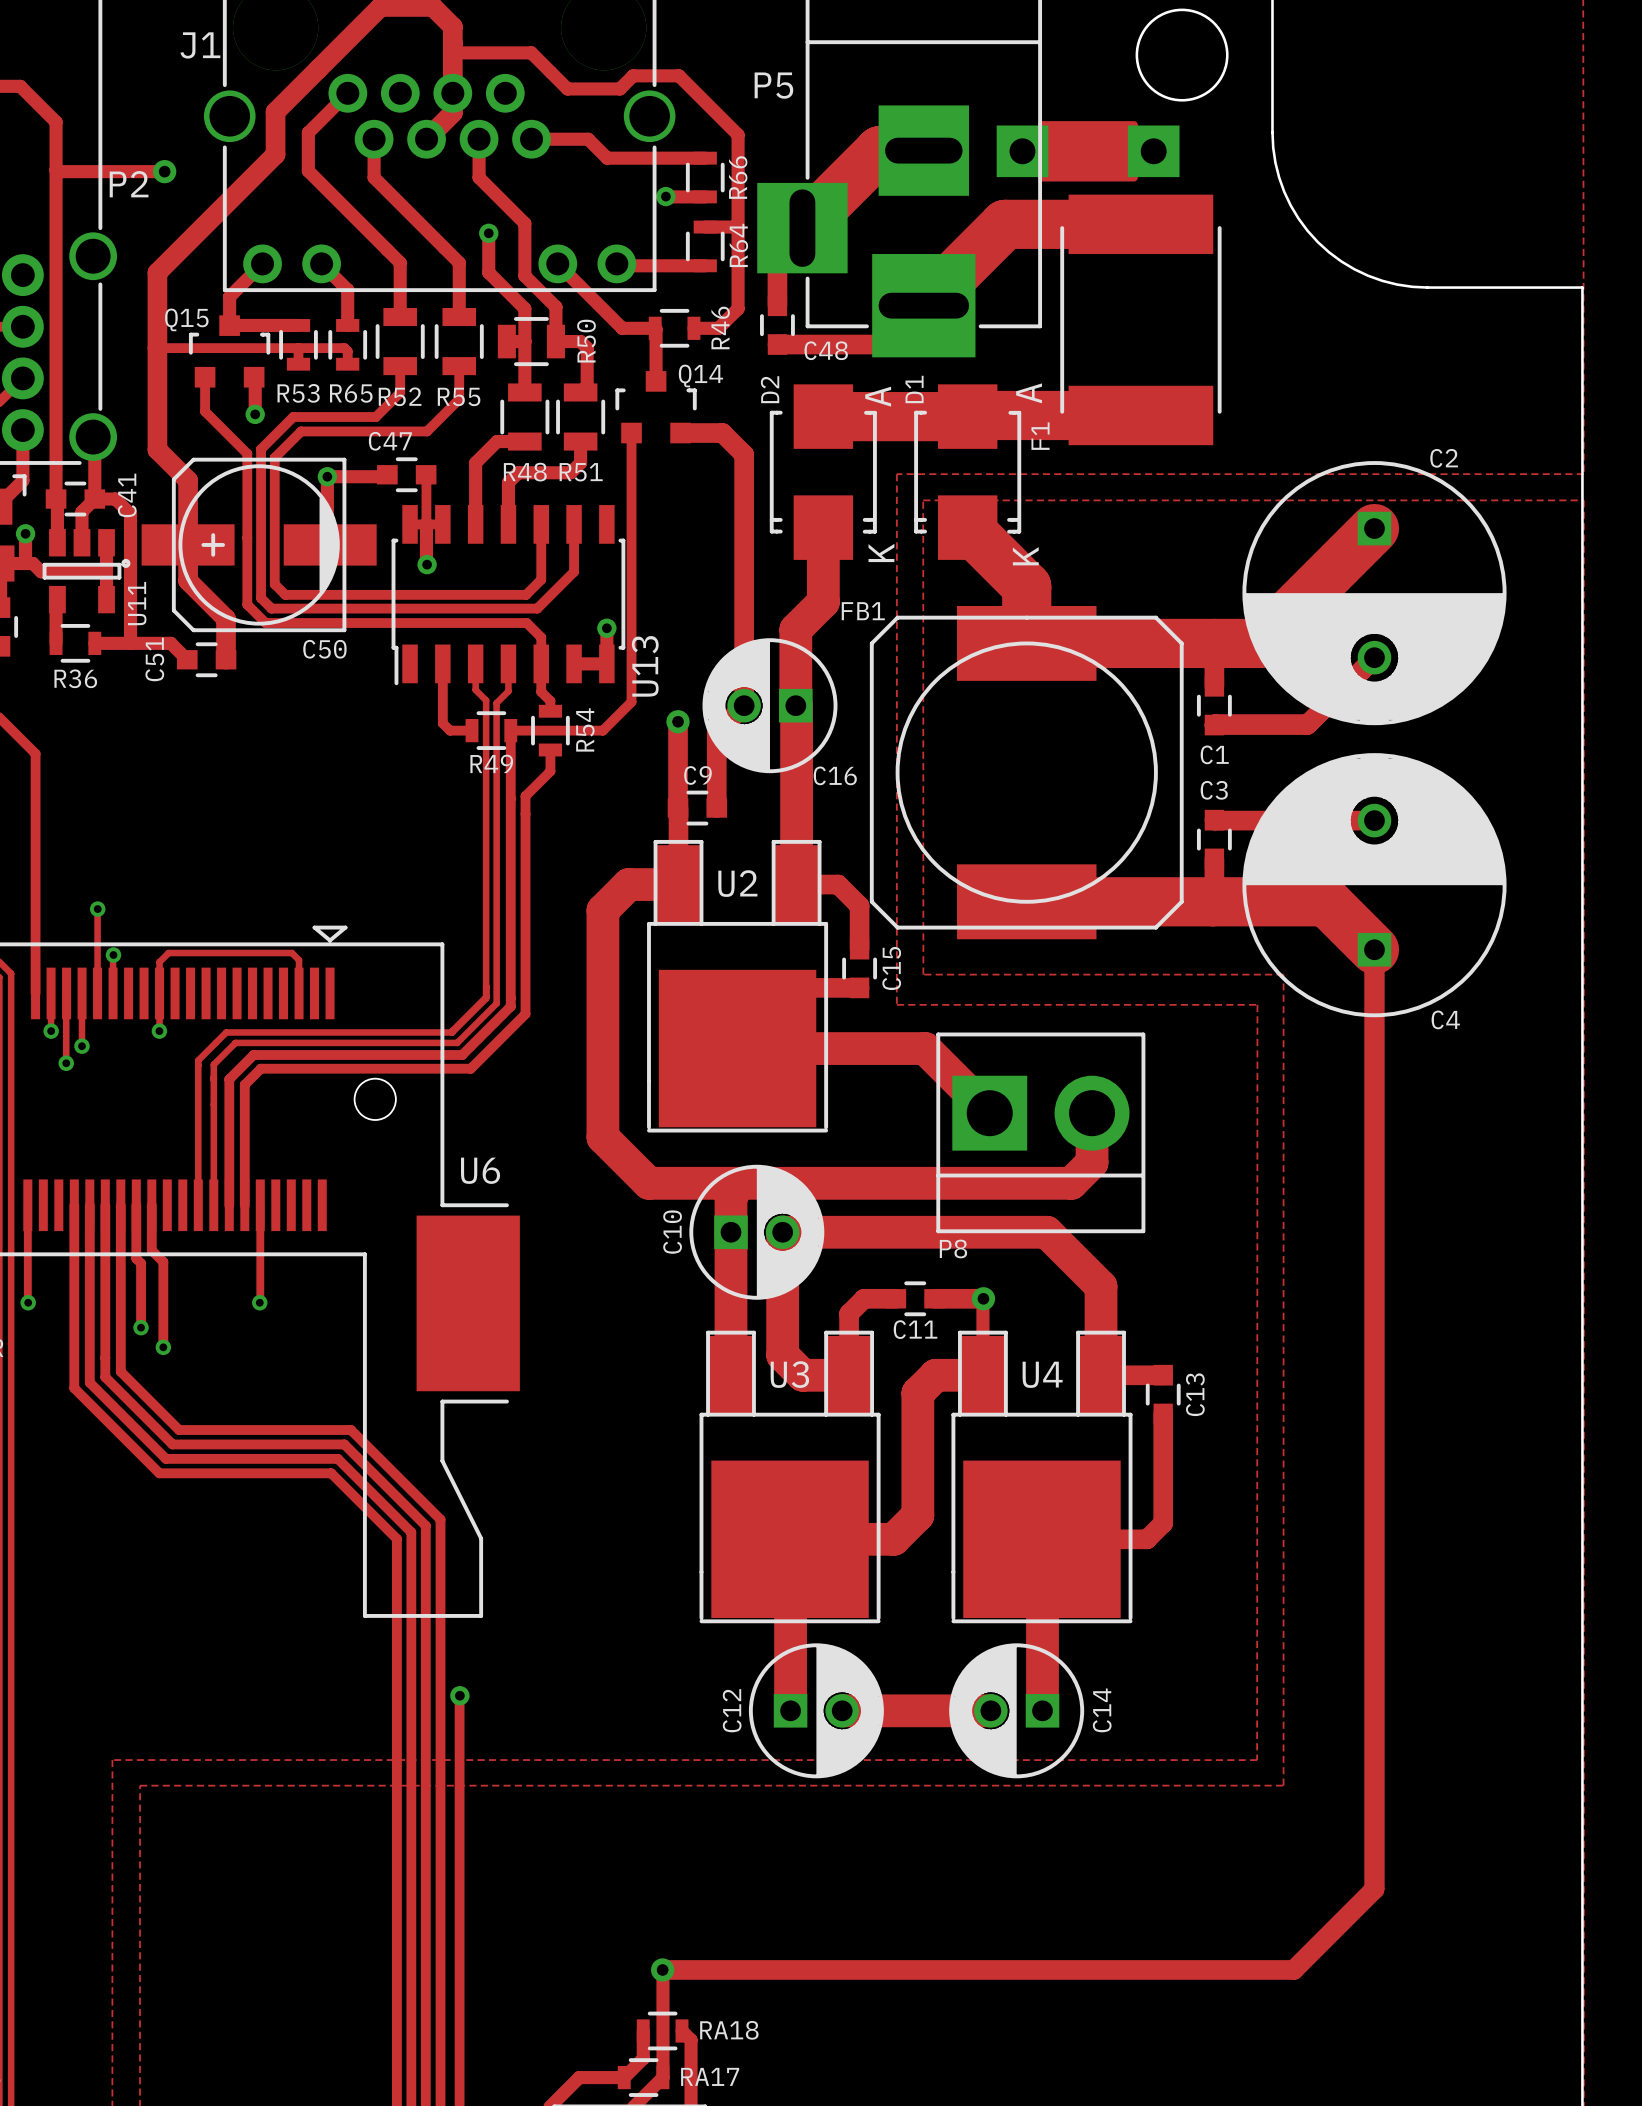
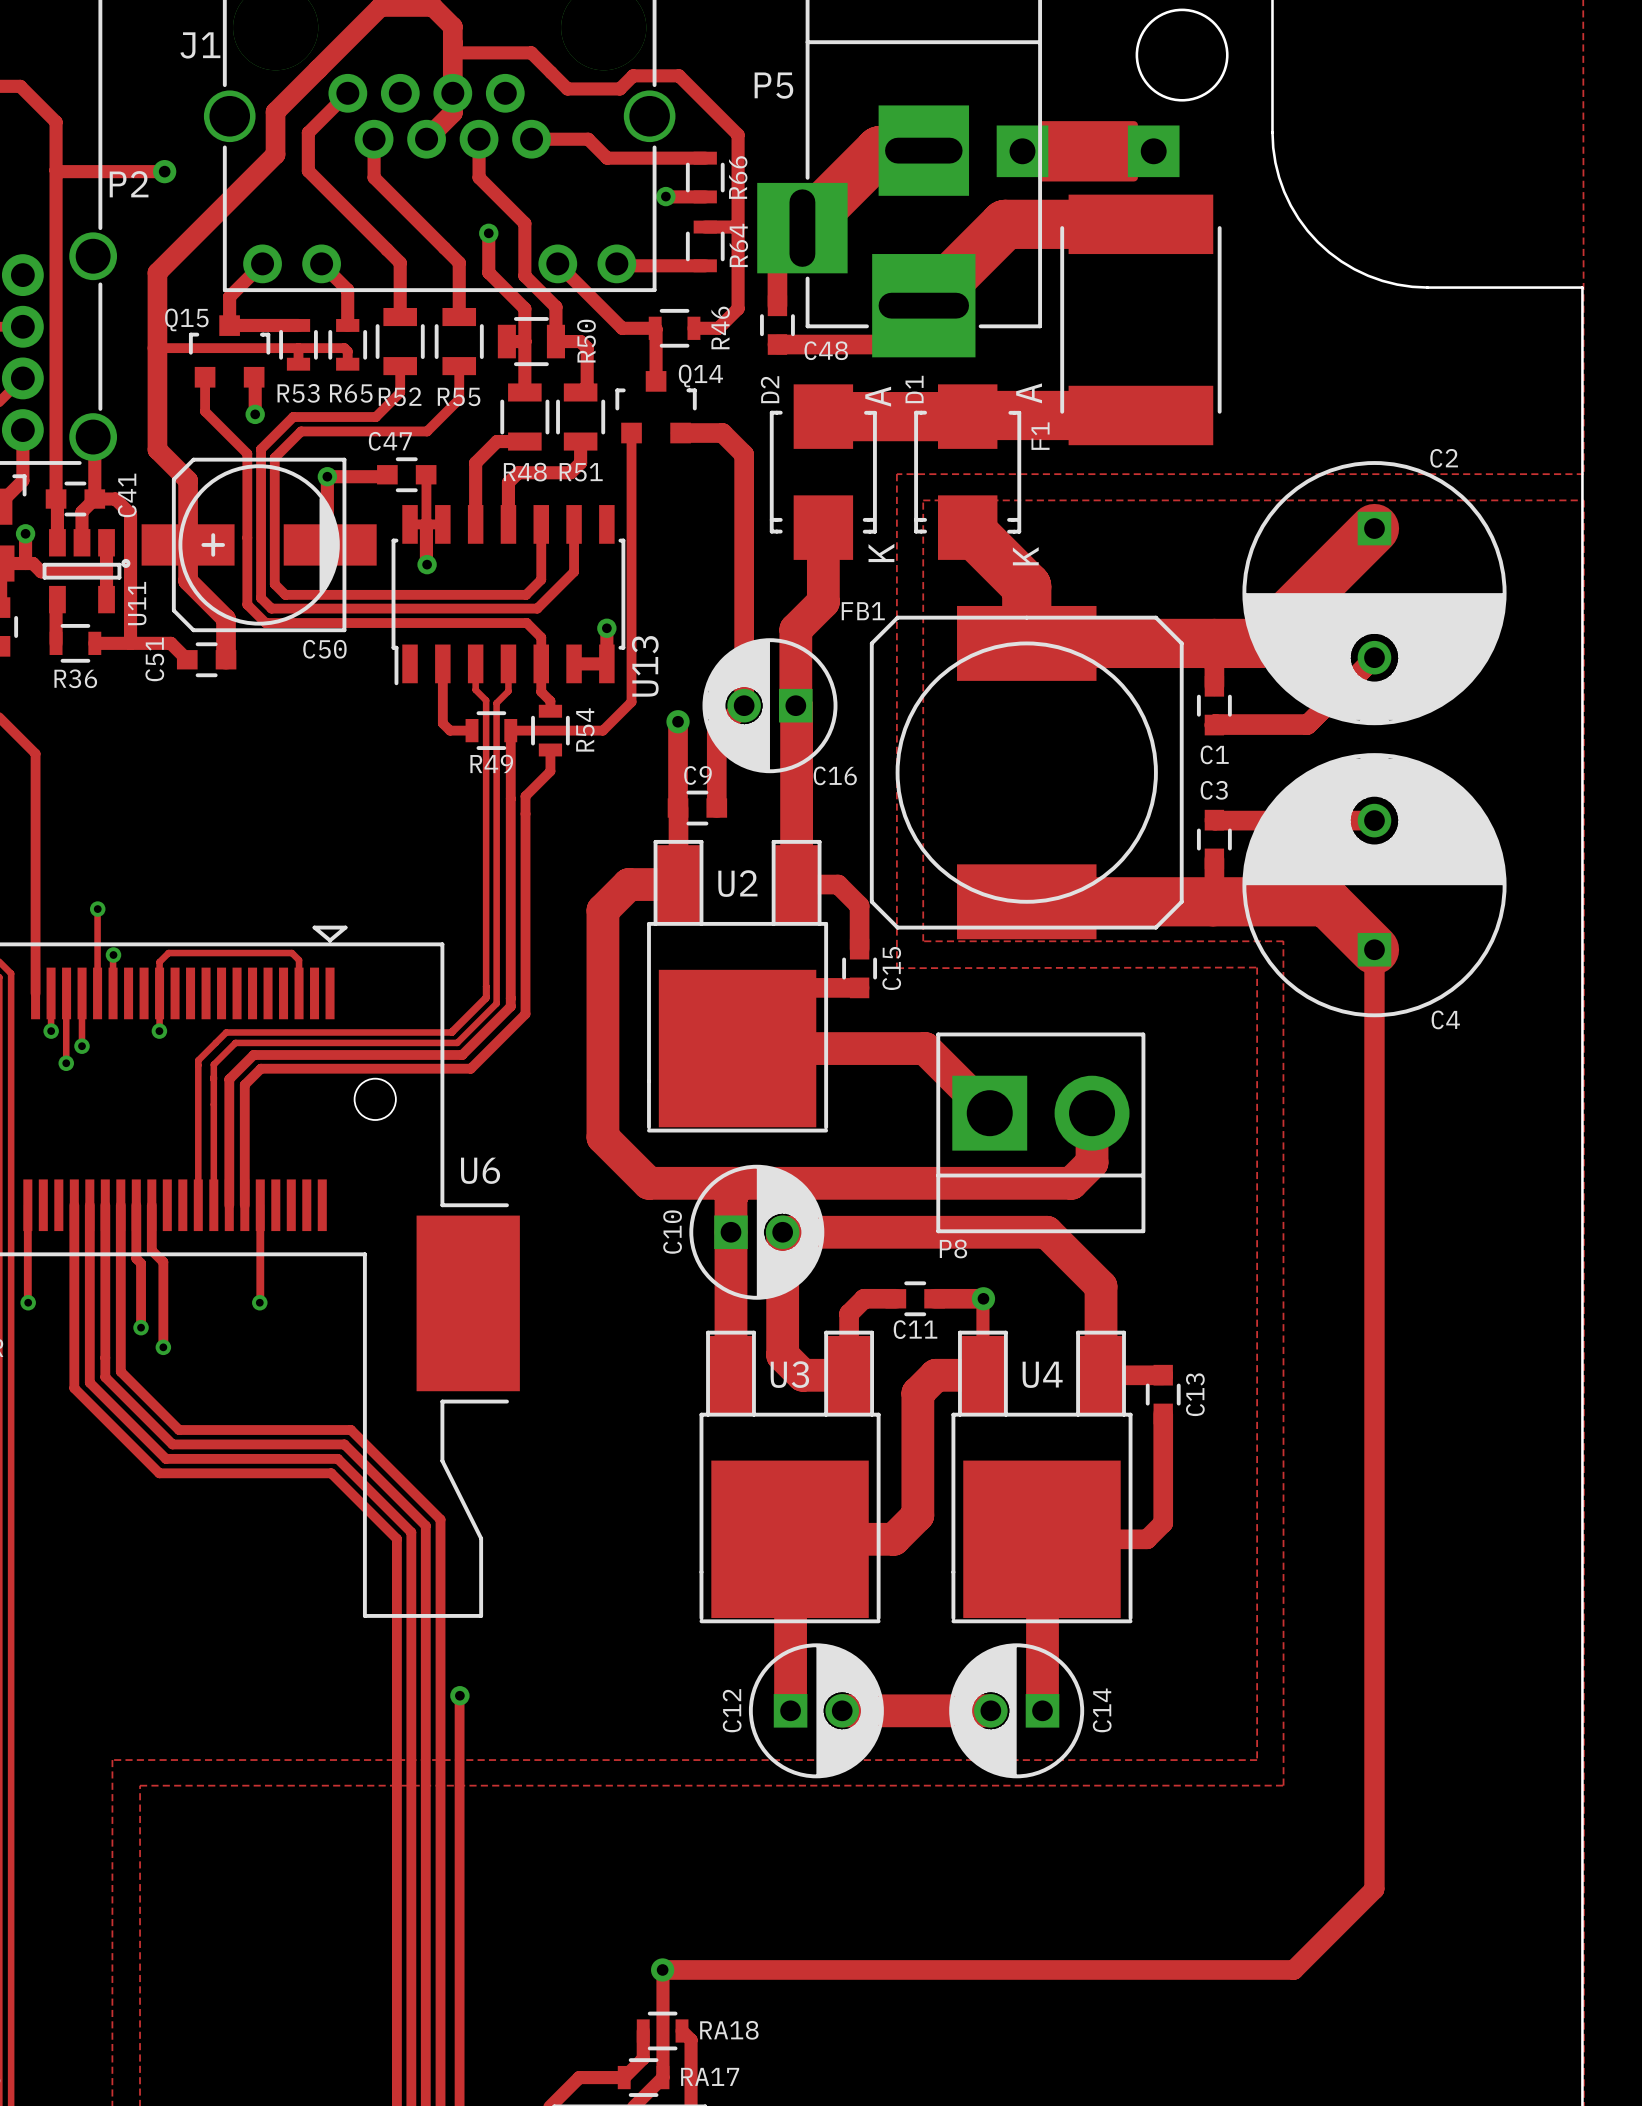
zone outline: (896, 474) (896, 1004) (1257, 1004) (1257, 1760) -> (896, 474) (896, 968) (1257, 967) (1257, 1760)
zone outline: (923, 500) (923, 974) (1283, 974) (1283, 1785) -> (923, 500) (923, 941) (1283, 941) (1283, 1785)

